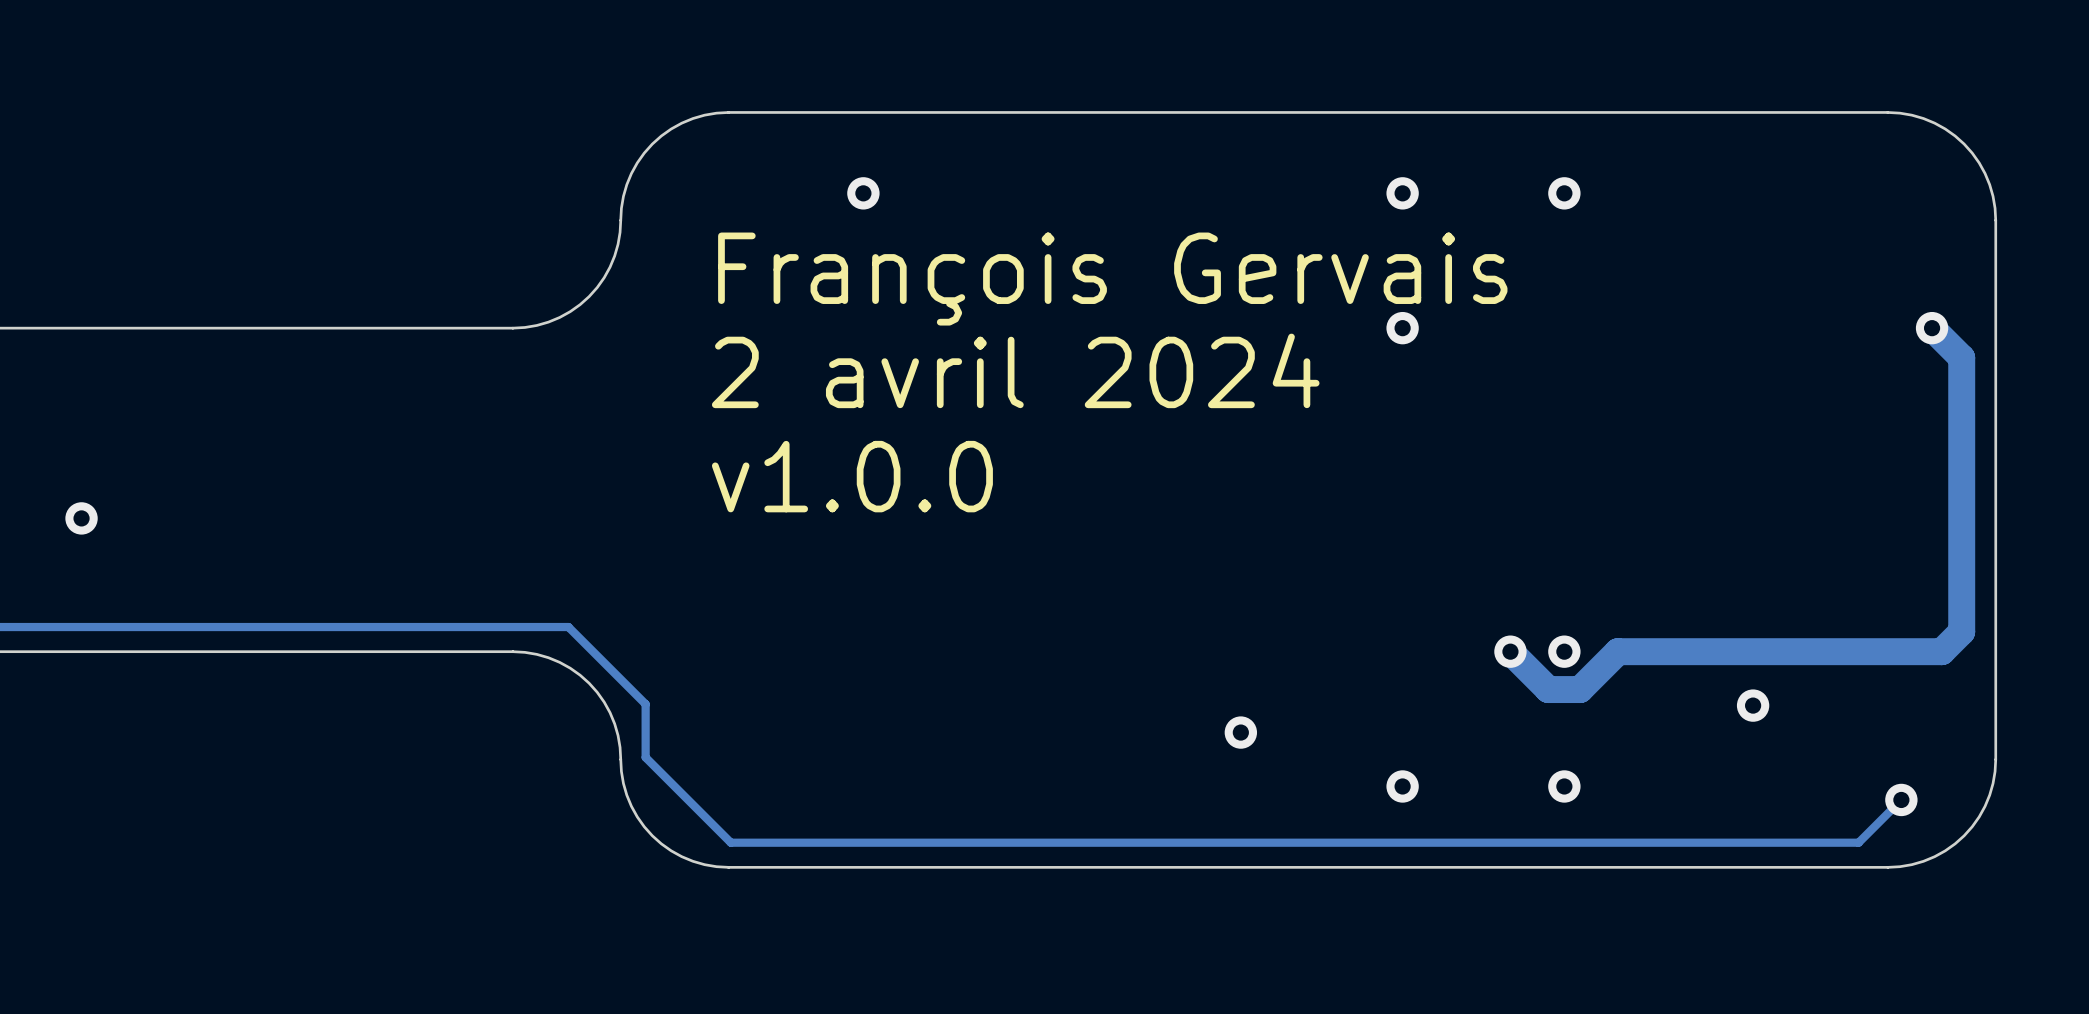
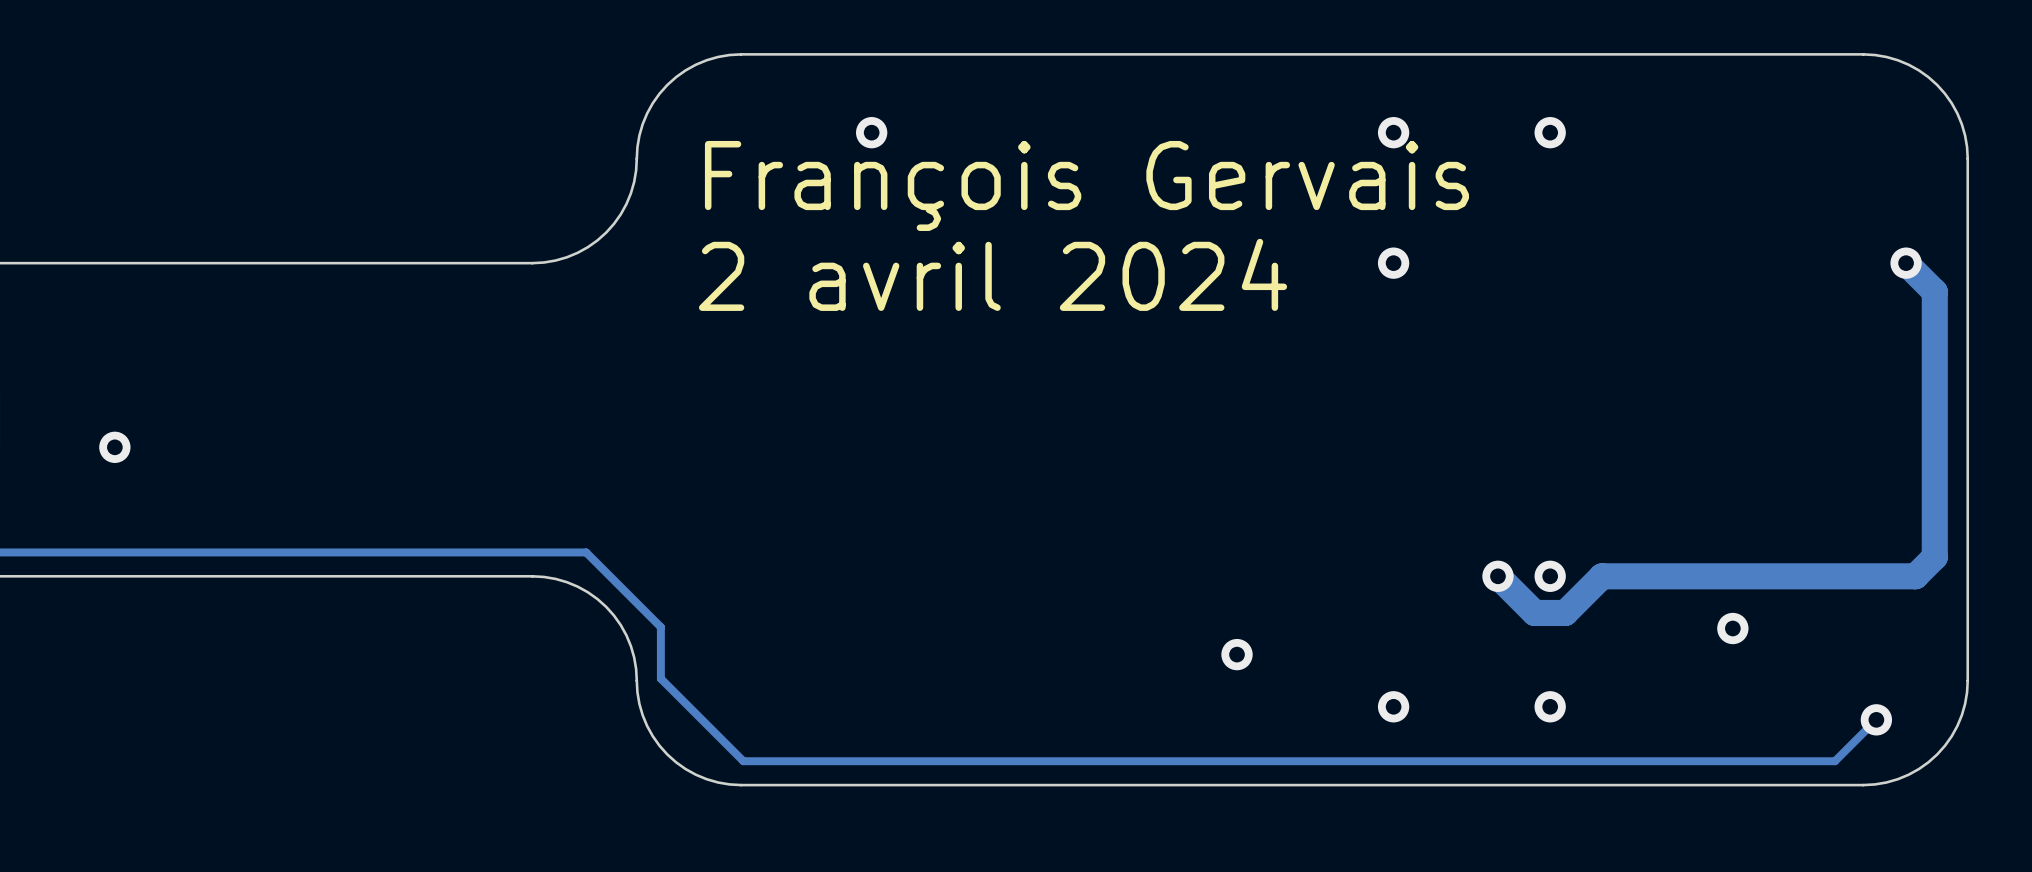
text position: François Gervais (1112, 279) -> François Gervais (1086, 185)
text position: 2 avril 2024 (1015, 370) -> 2 avril 2024 (993, 274)
text: v1.0.0 (852, 476) -> none

